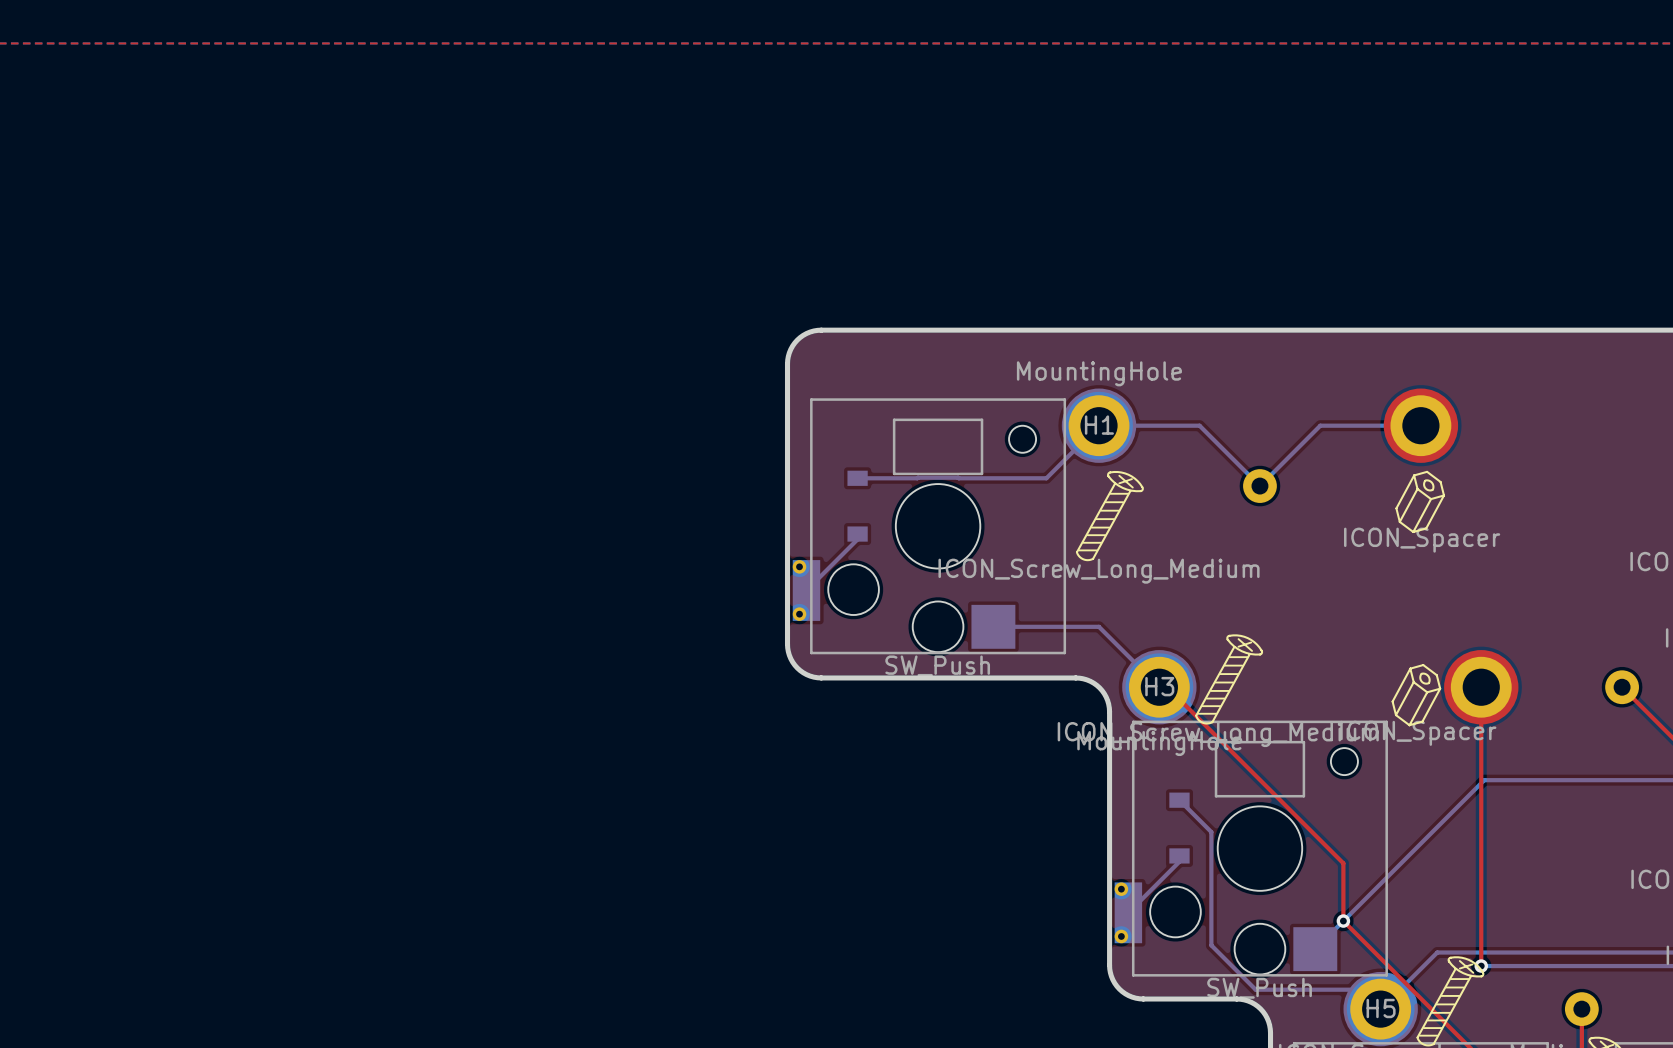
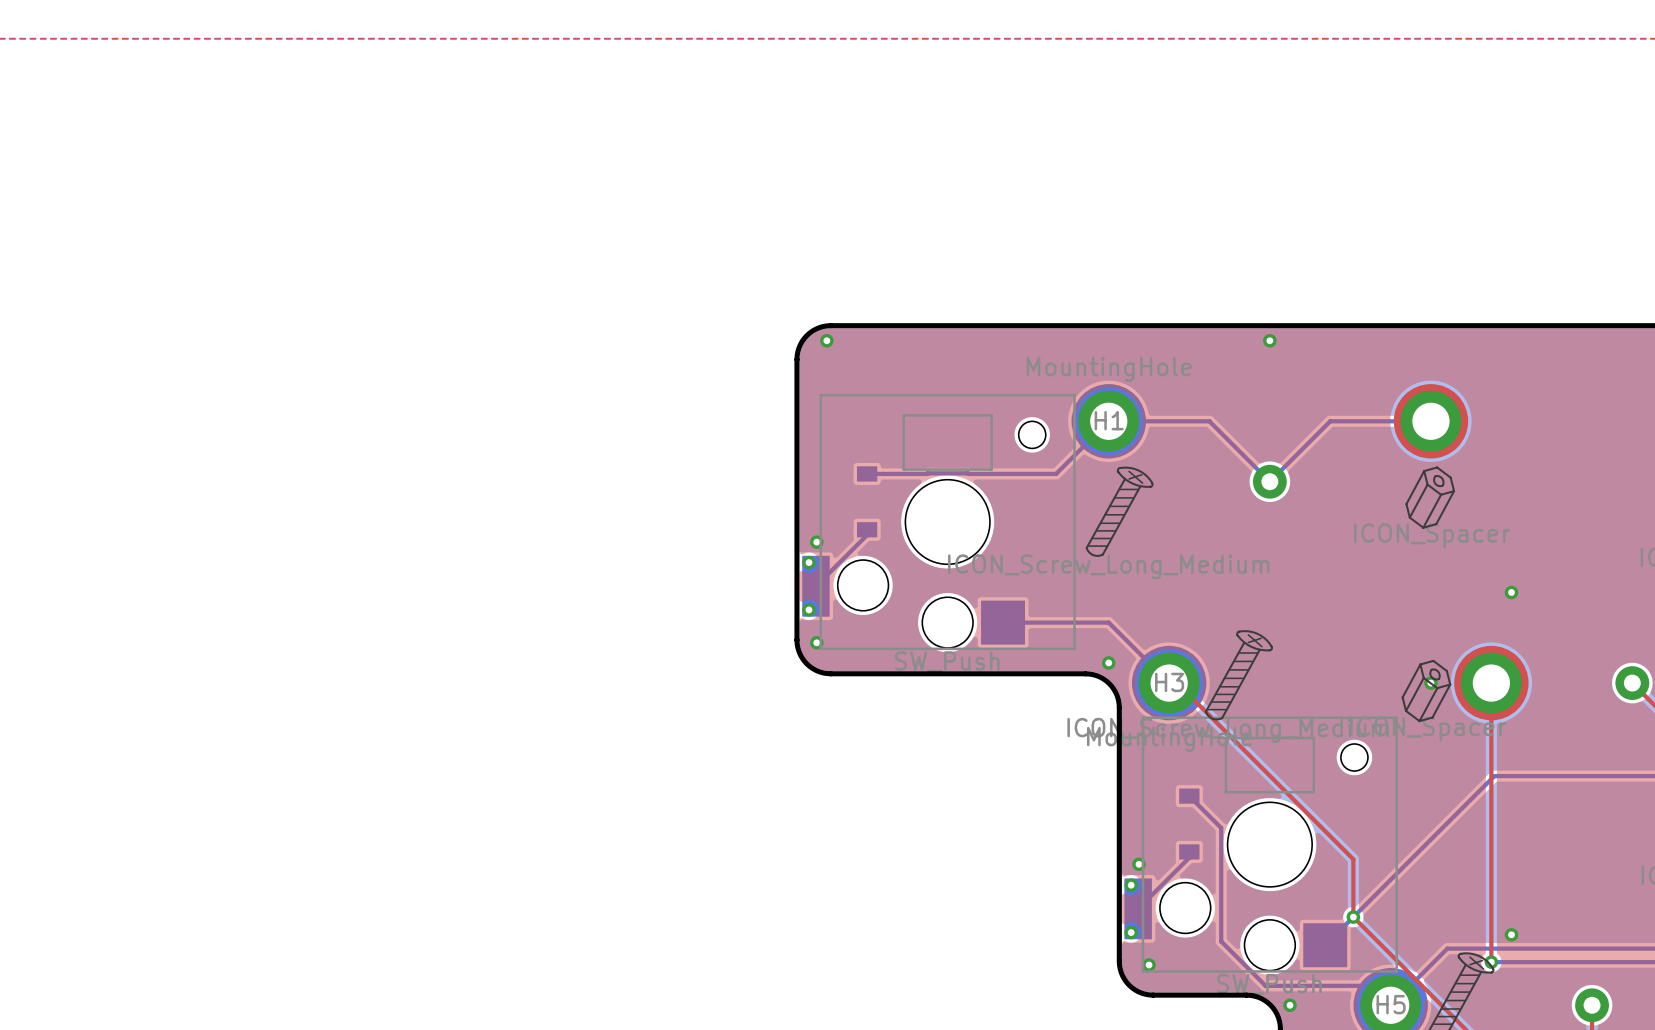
via: none -> (826, 340)
via: none -> (1269, 340)
via: none -> (816, 542)
via: none -> (1511, 592)
via: none -> (816, 642)
via: none -> (1108, 662)
via: none -> (1430, 683)
via: none -> (1138, 864)
via: none -> (1511, 934)
via: none -> (1149, 965)
via: none -> (1290, 1005)

